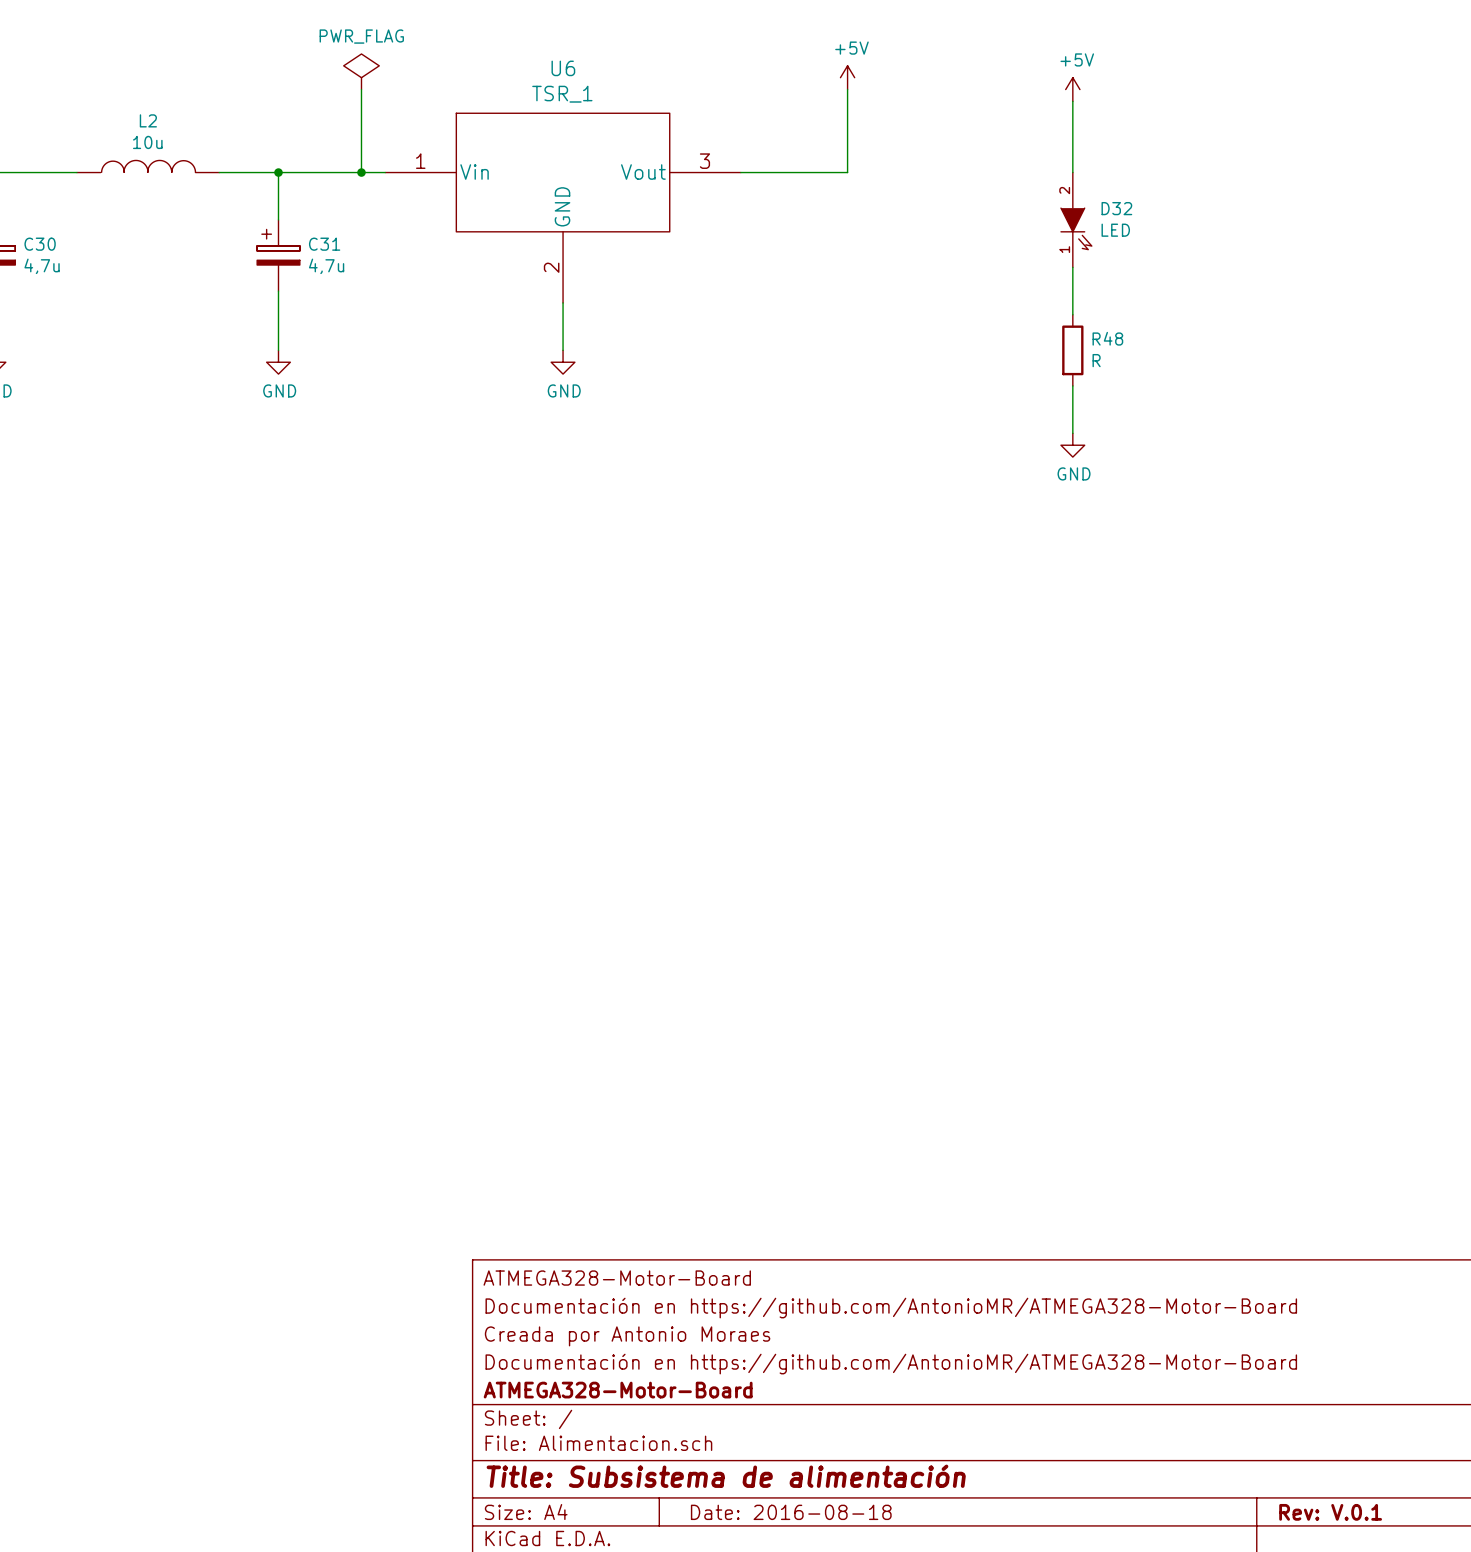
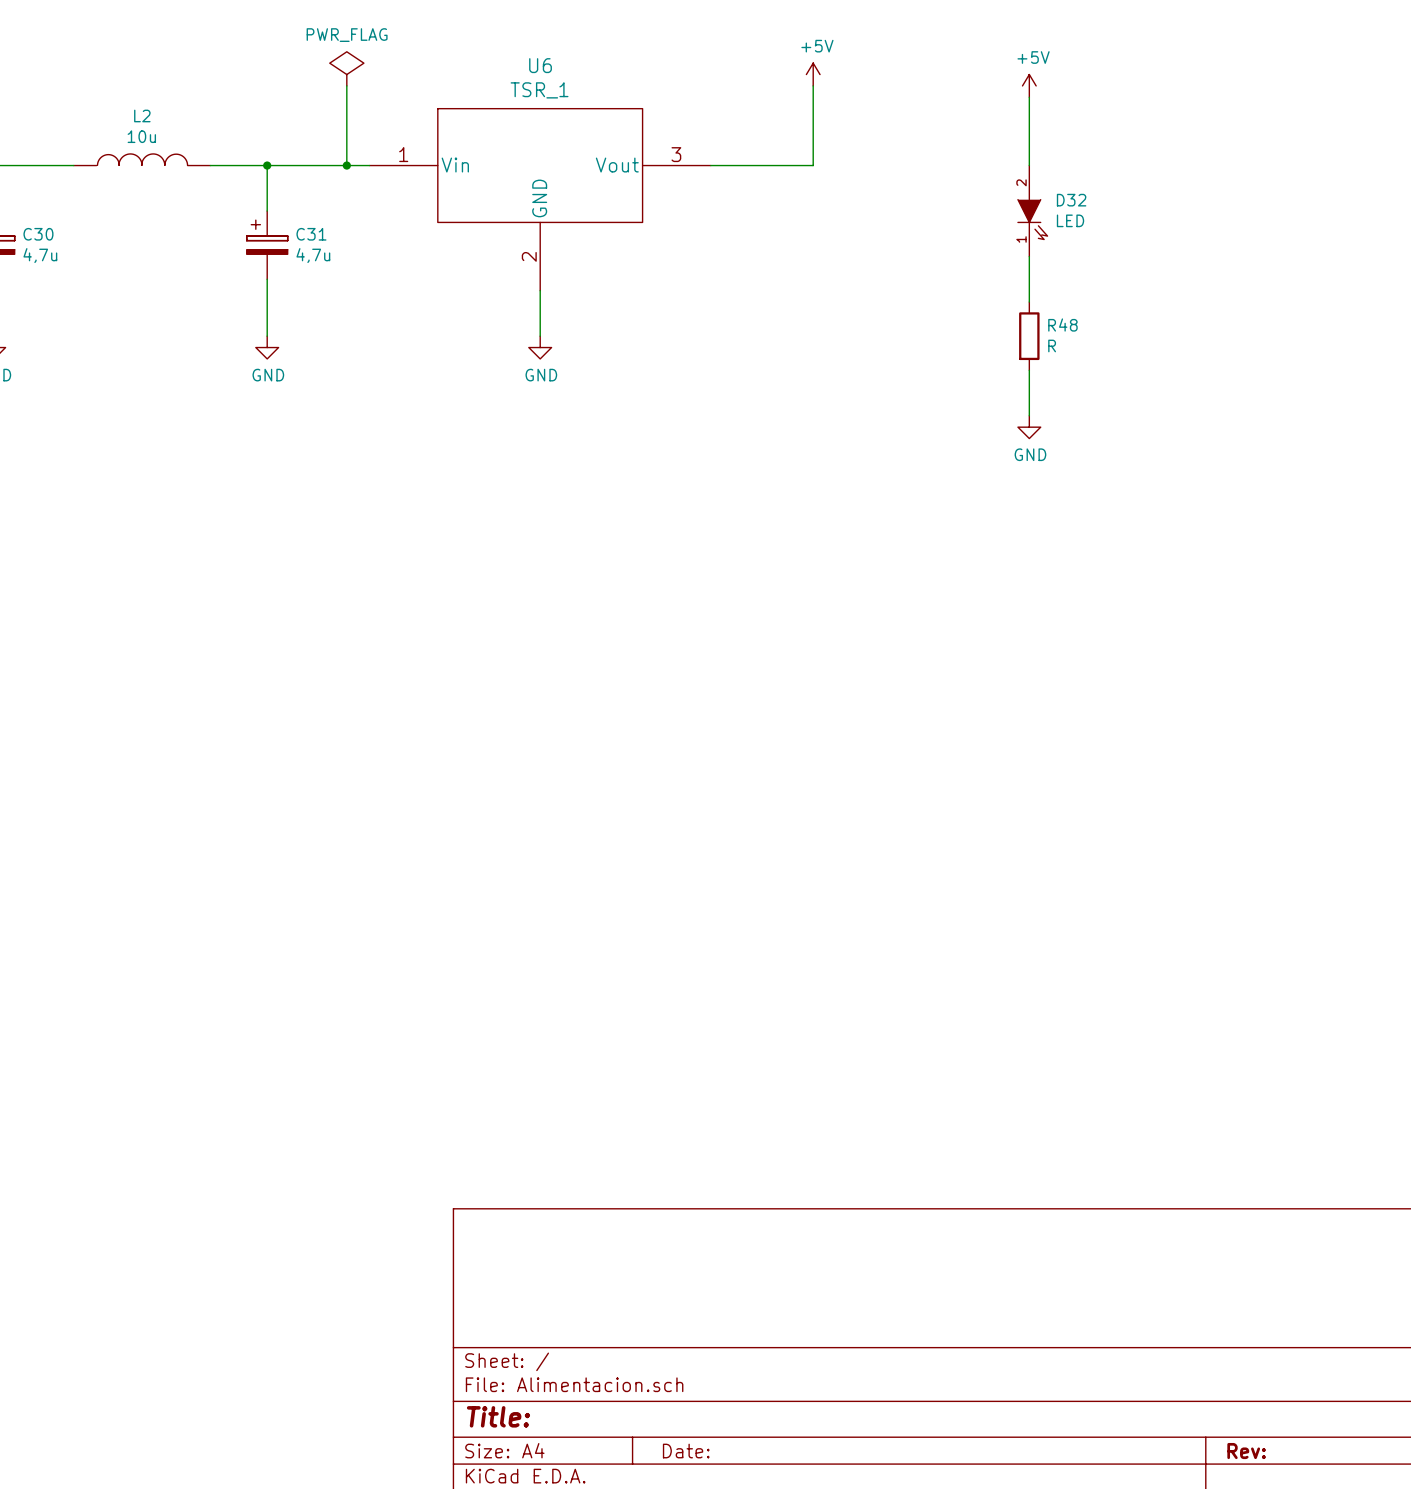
title block: ATMEGA328-Motor-Board (617, 1278) -> none
title block: Documentación en https://github.com/AntonioMR/ATMEGA328-Motor-Board (891, 1308) -> none
title block: Creada por Antonio Moraes (627, 1336) -> none
title block: Documentación en https://github.com/AntonioMR/ATMEGA328-Motor-Board (891, 1364) -> none
title block: ATMEGA328-Motor-Board (618, 1390) -> none
title block: Title: Subsistema de alimentación (726, 1476) -> Title: (498, 1416)
title block: Date: 2016-08-18 (791, 1512) -> Date: (686, 1451)
title block: Rev: V.0.1 (1330, 1512) -> Rev: (1246, 1451)

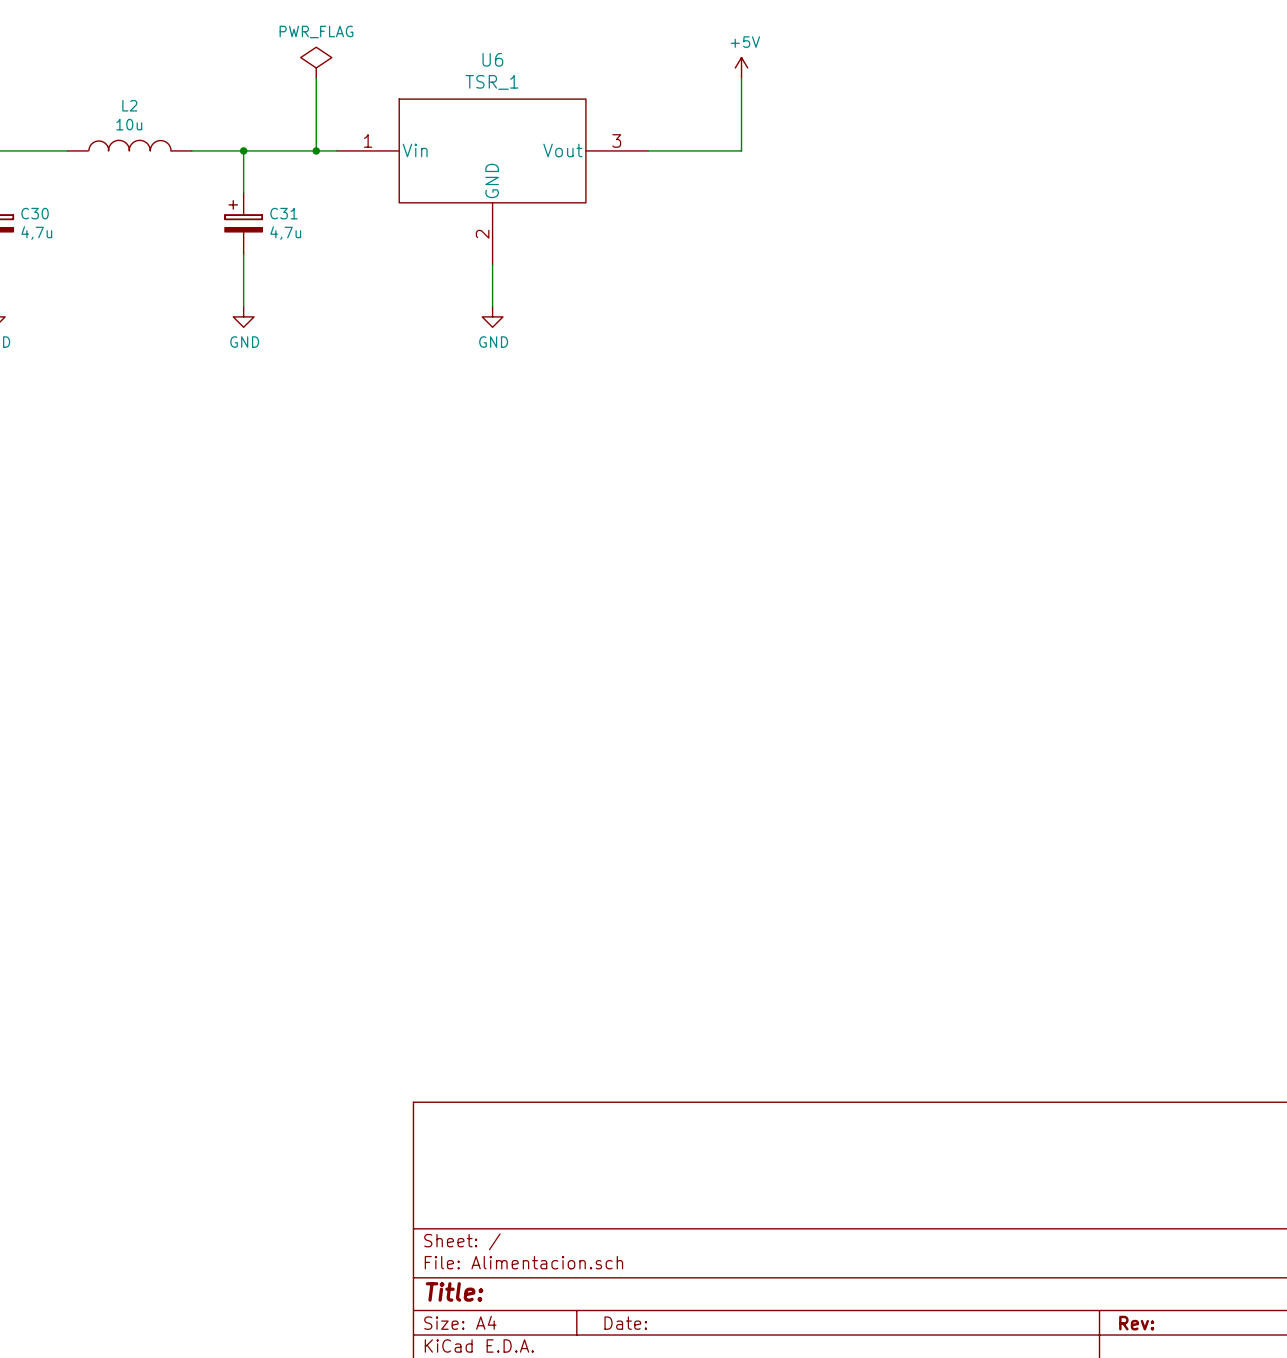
power symbol: +5V (1029, 85) -> none
wire: (1029, 97) (1029, 165) -> none
D32: LED (1032, 211) -> none
wire: (1029, 256) (1029, 302) -> none
R48: R (1029, 336) -> none
wire: (1029, 370) (1029, 415) -> none
power symbol: GND (1029, 427) -> none

